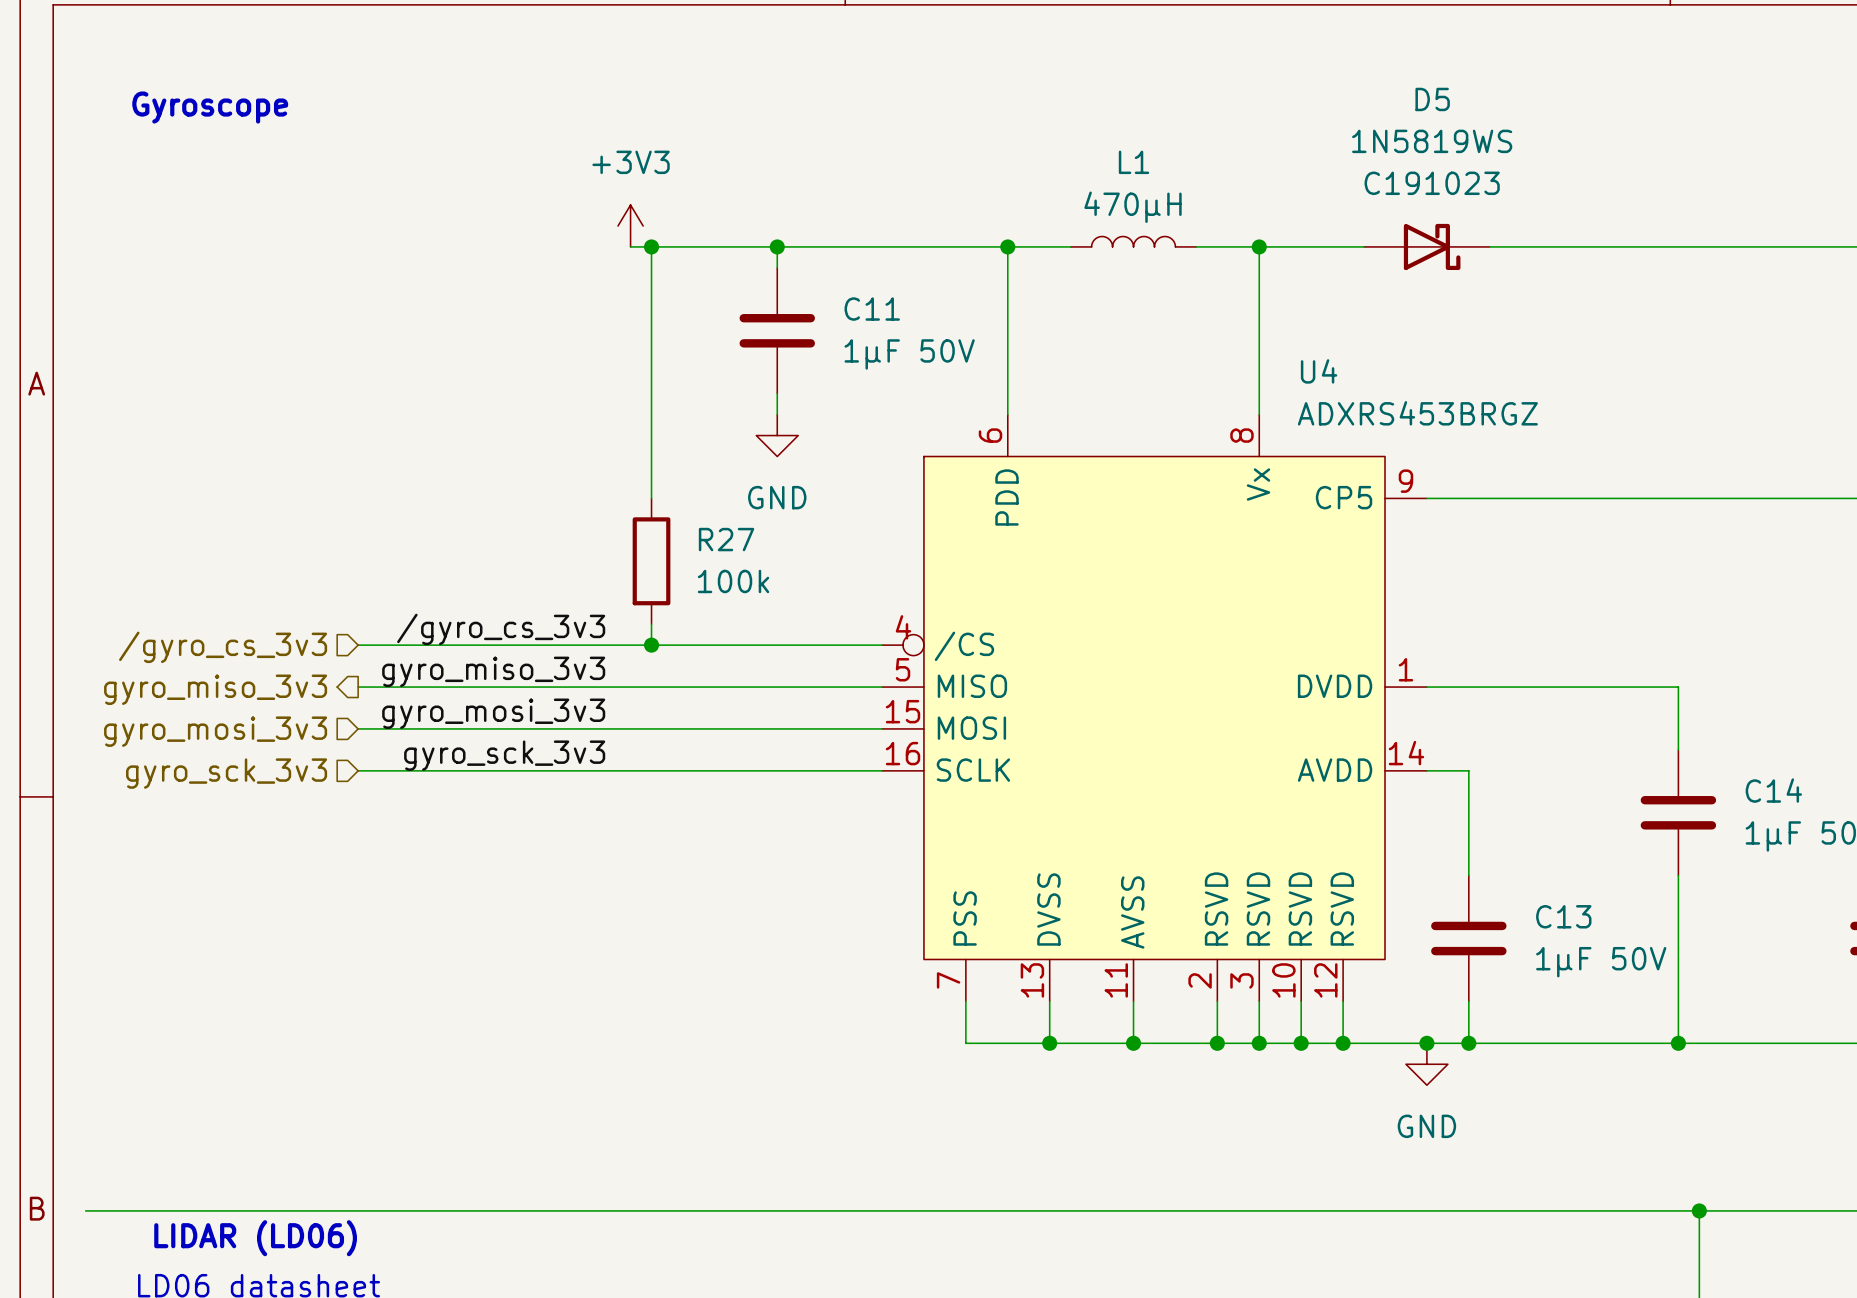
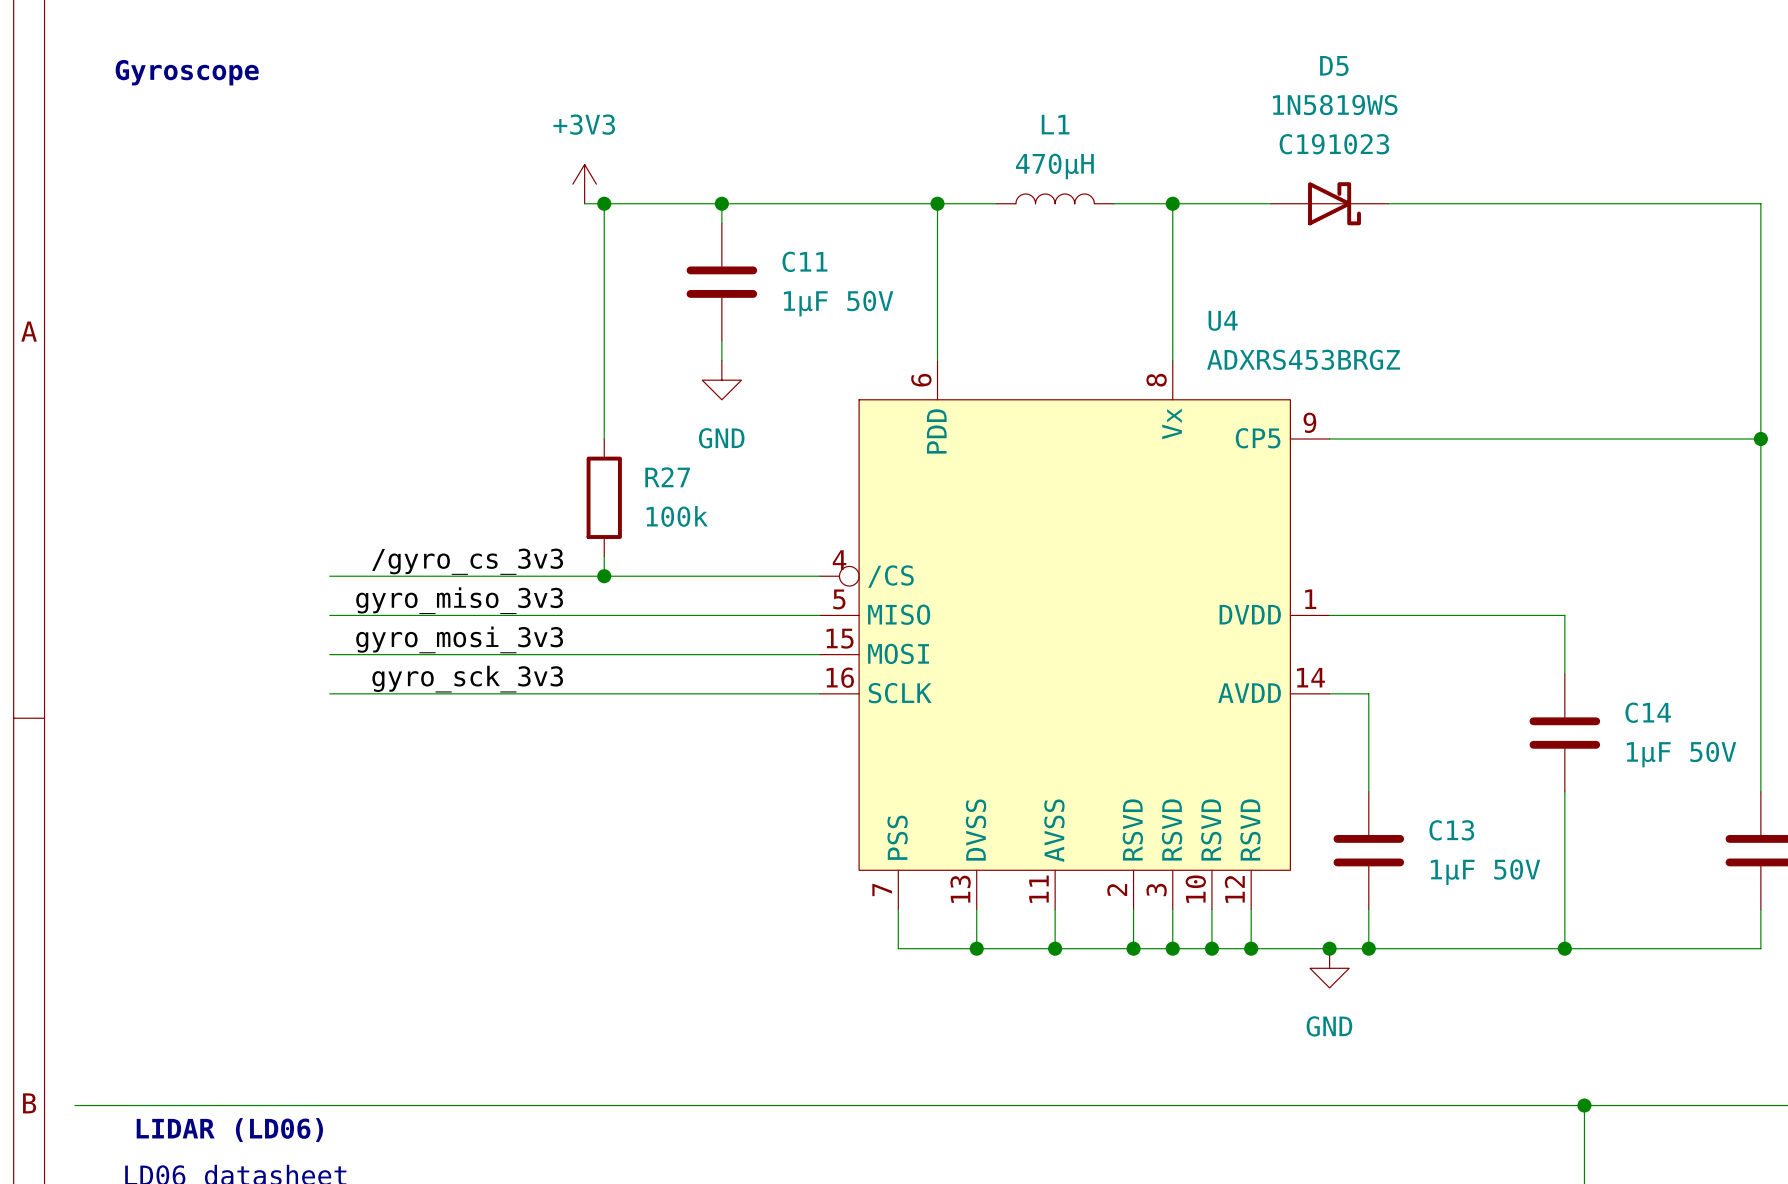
hierarchical label: /gyro_cs_3v3 (223, 647) -> none
hierarchical label: gyro_miso_3v3 (215, 689) -> none
hierarchical label: gyro_mosi_3v3 (215, 731) -> none
hierarchical label: gyro_sck_3v3 (226, 773) -> none

